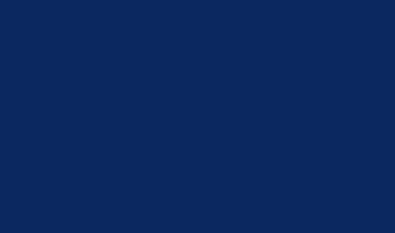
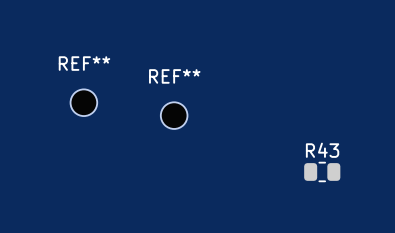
REF**: none -> (83, 102)
REF**: none -> (174, 115)
R43: none -> (322, 171)

